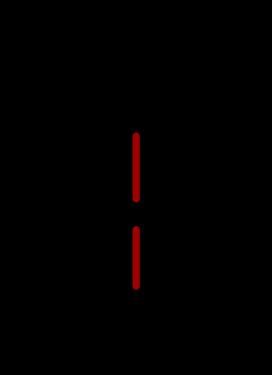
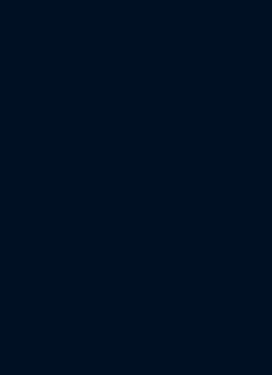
track: (136, 136) (136, 198) -> none
track: (136, 229) (136, 286) -> none

